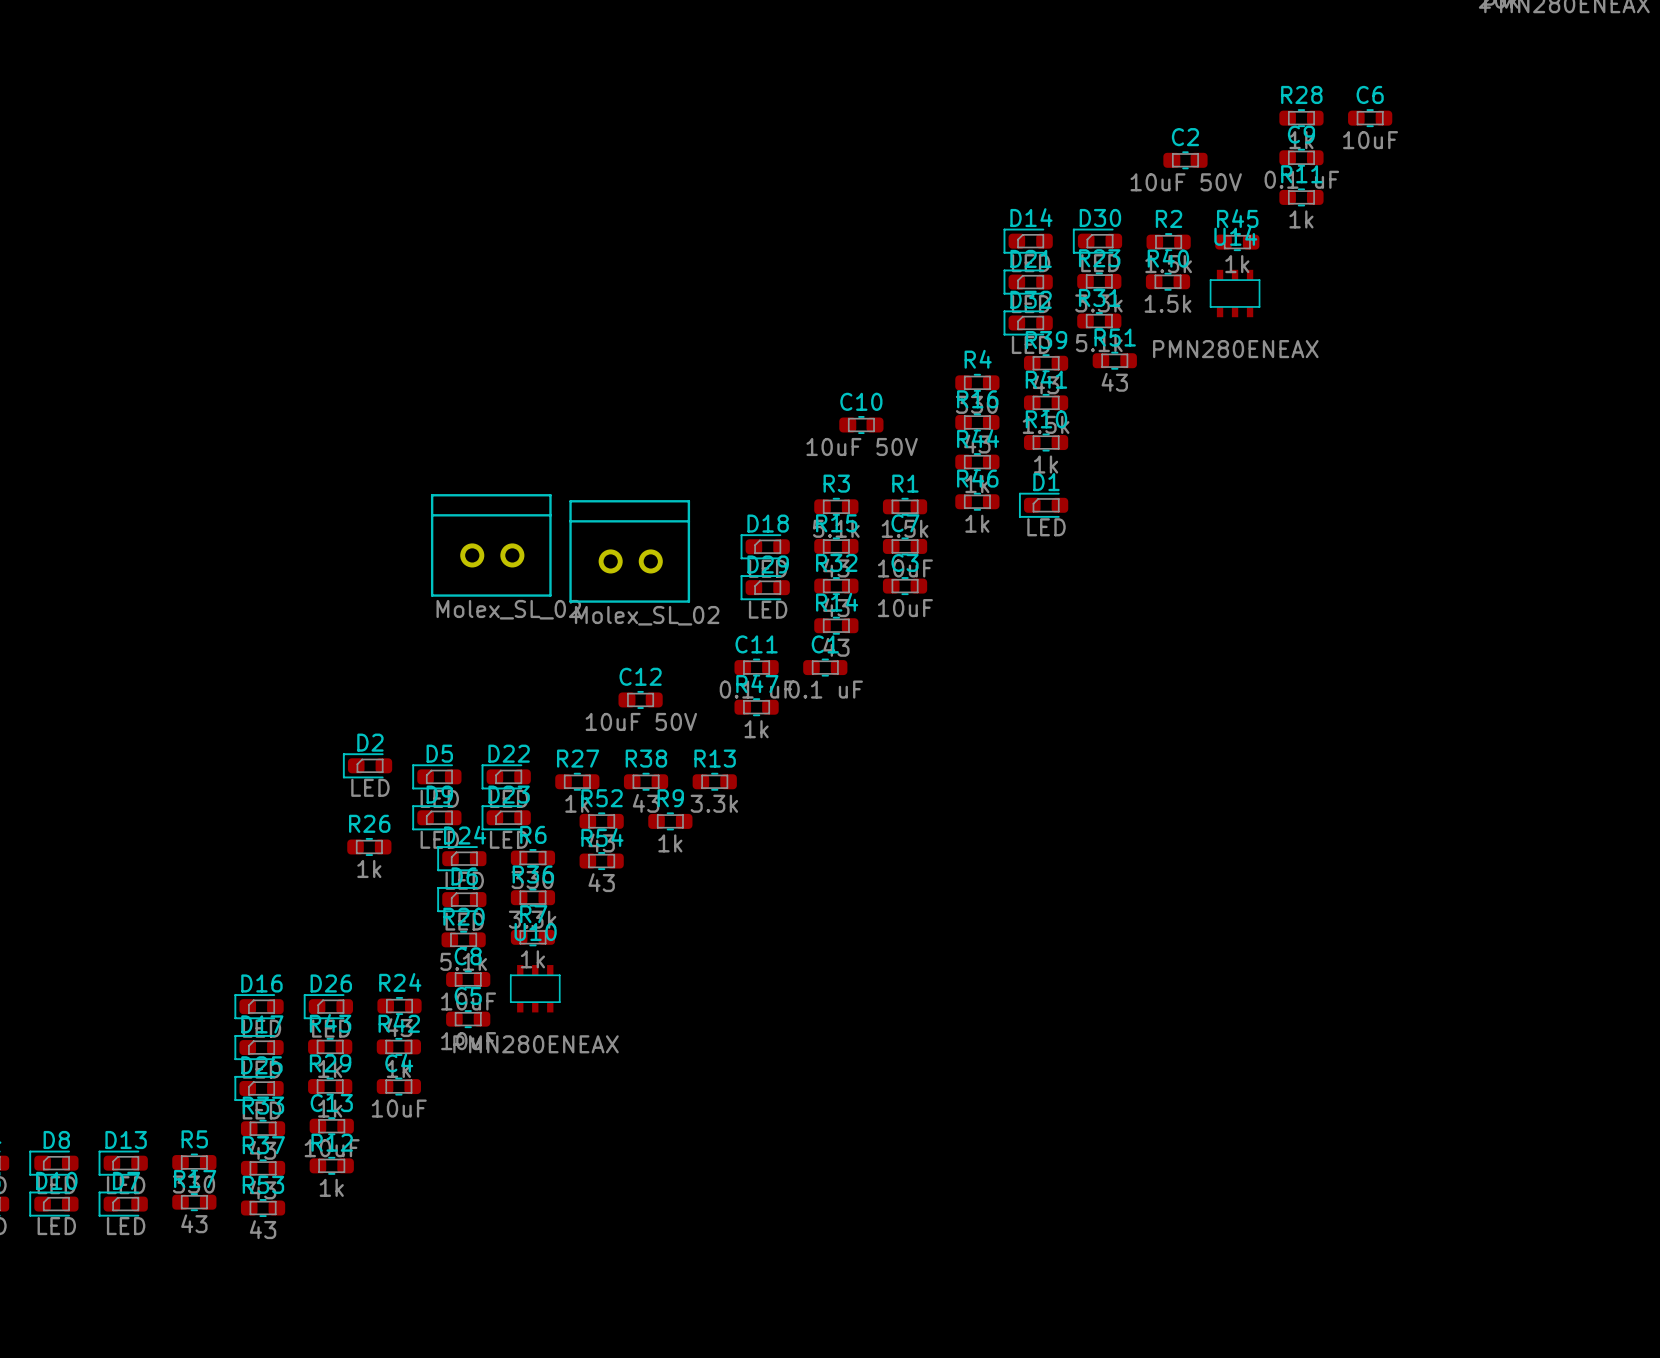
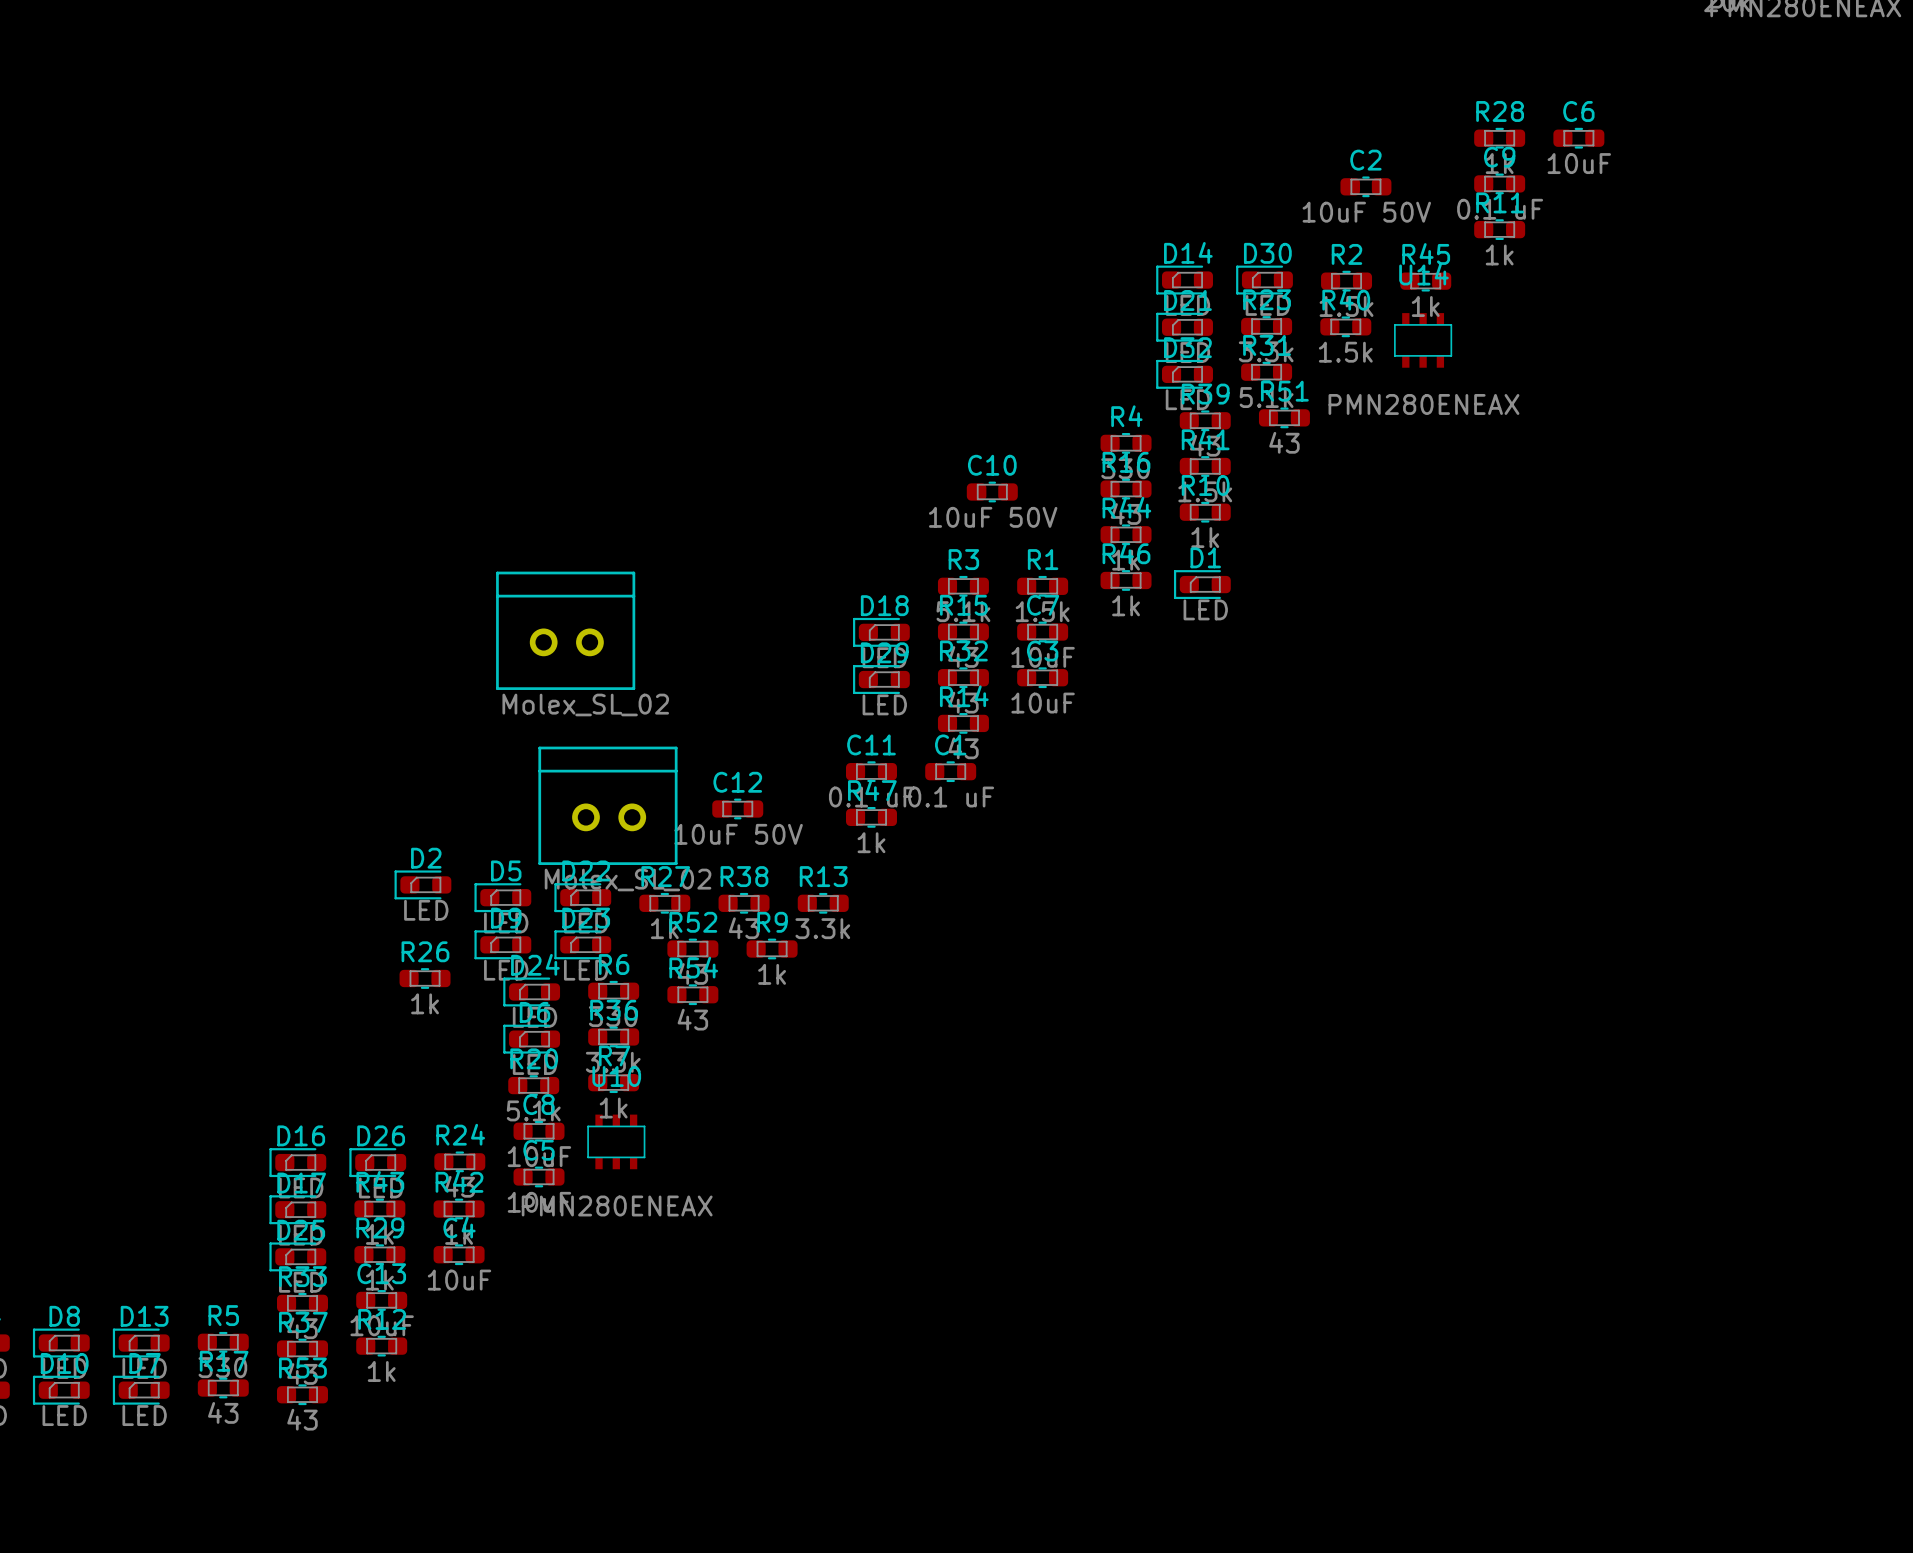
part position: (629, 551) -> (607, 805)

